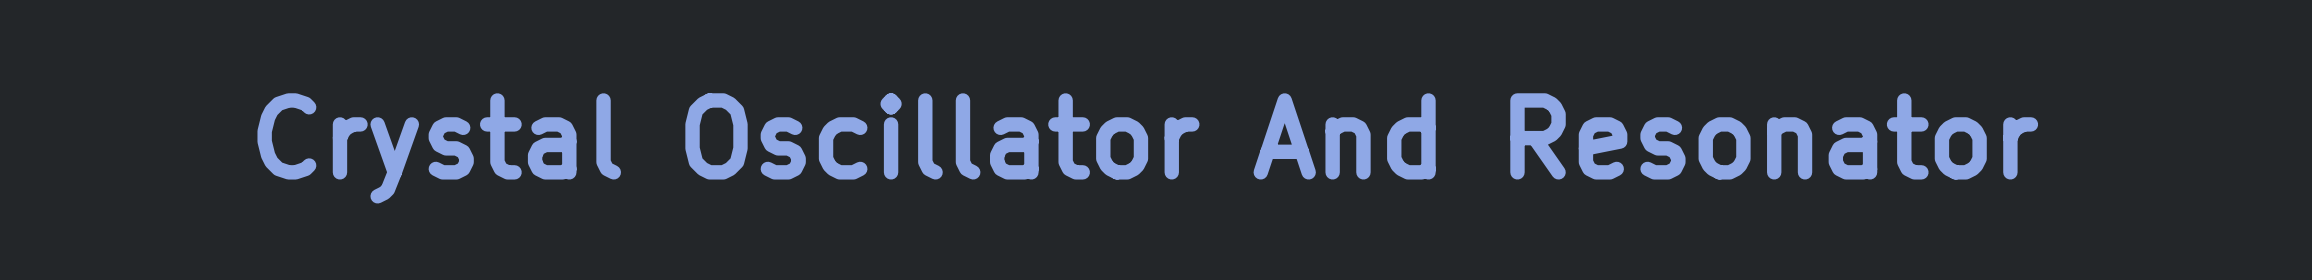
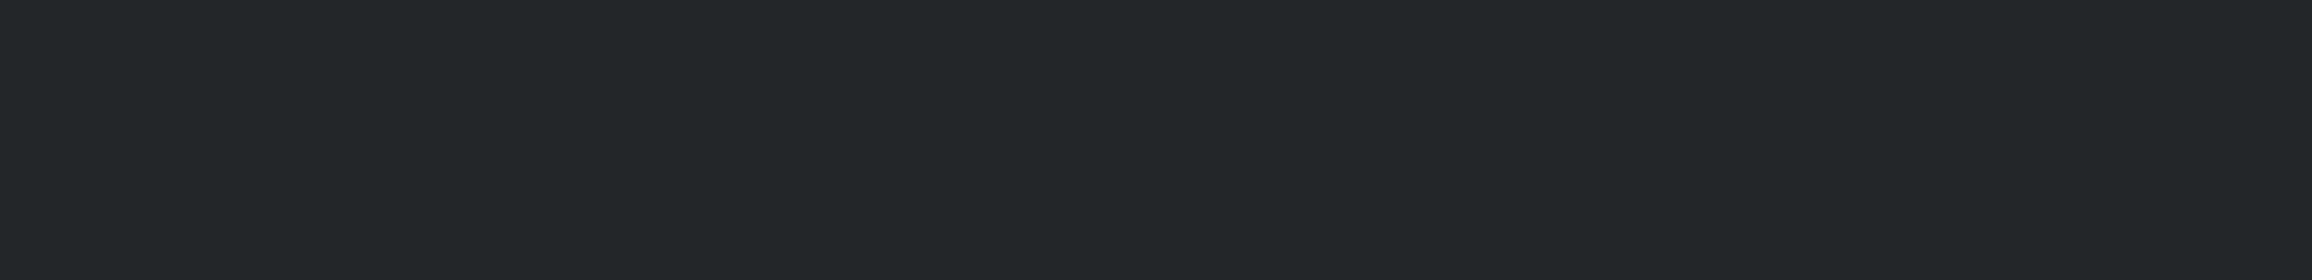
text: Crystal Oscillator And Resonator (1147, 148) -> none

